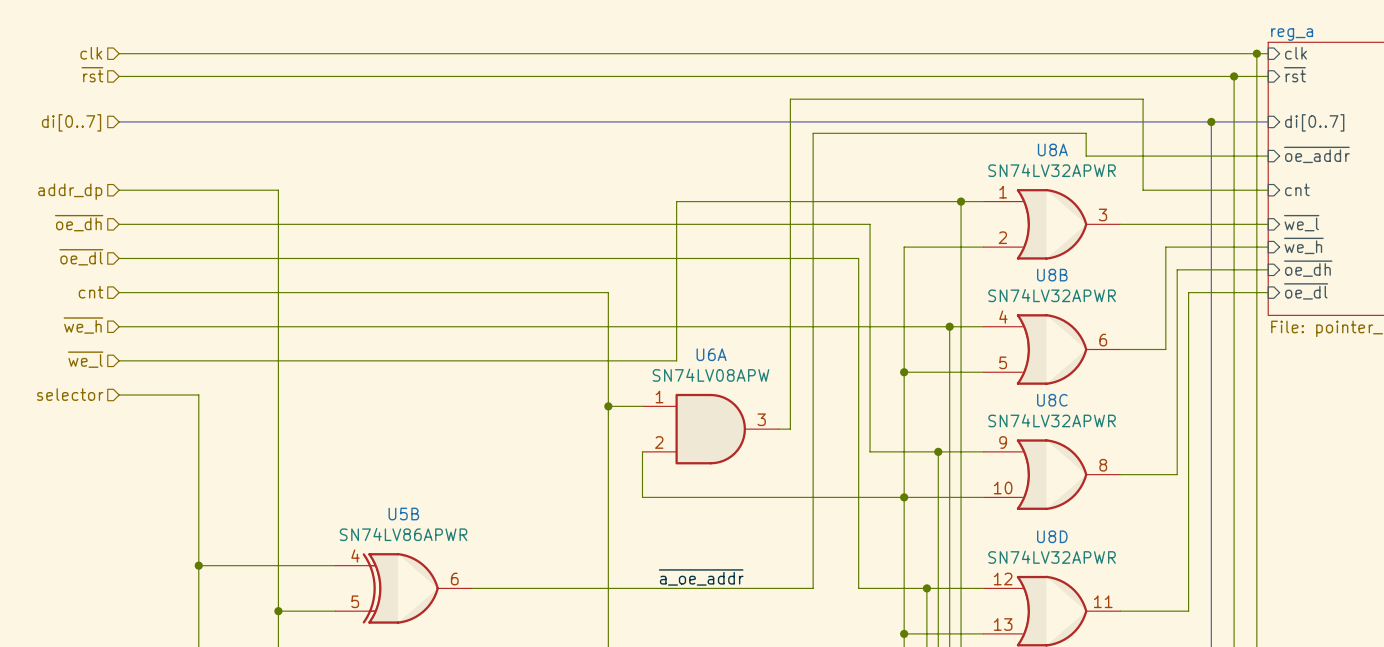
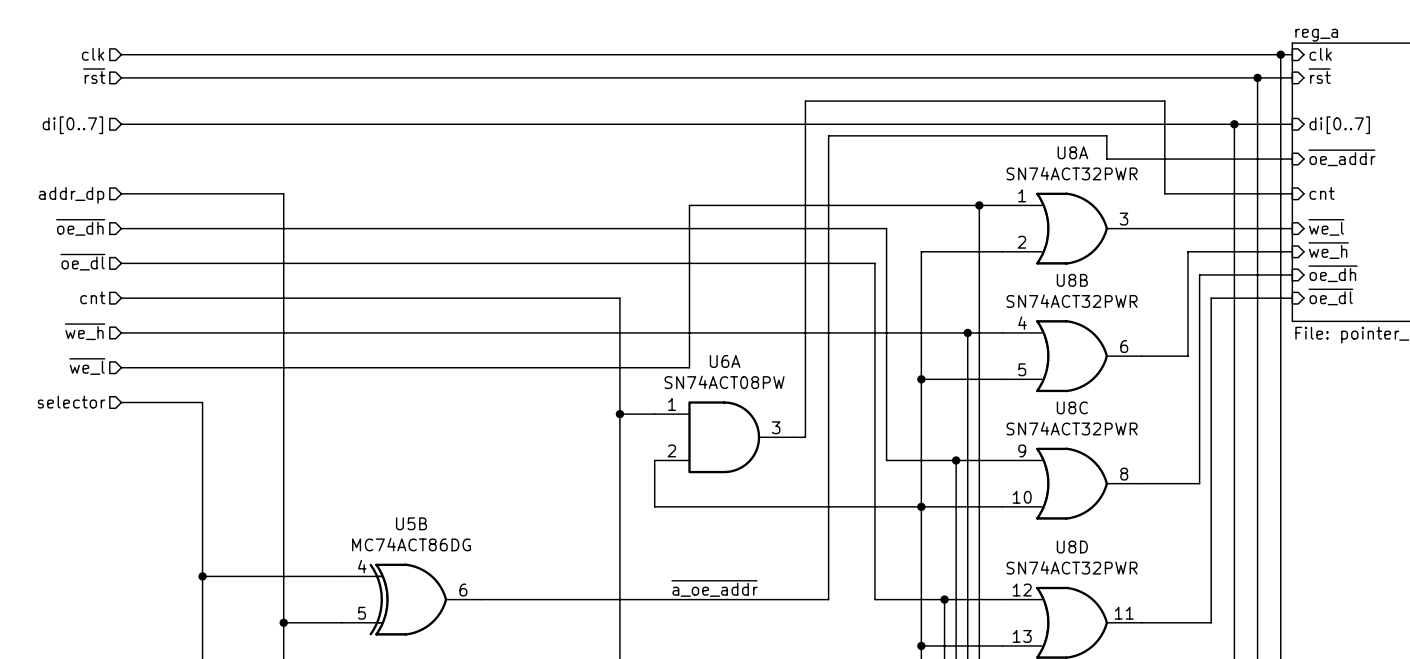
U8A value: SN74LV32APWR (1052, 170) -> SN74ACT32PWR (1072, 173)
U8B value: SN74LV32APWR (1052, 295) -> SN74ACT32PWR (1072, 301)
U6A value: SN74LV08APW (711, 375) -> SN74ACT08PW (724, 382)
U8C value: SN74LV32APWR (1052, 420) -> SN74ACT32PWR (1072, 428)
U5B value: SN74LV86APWR (403, 534) -> MC74ACT86DG (411, 544)
U8D value: SN74LV32APWR (1052, 557) -> SN74ACT32PWR (1072, 567)

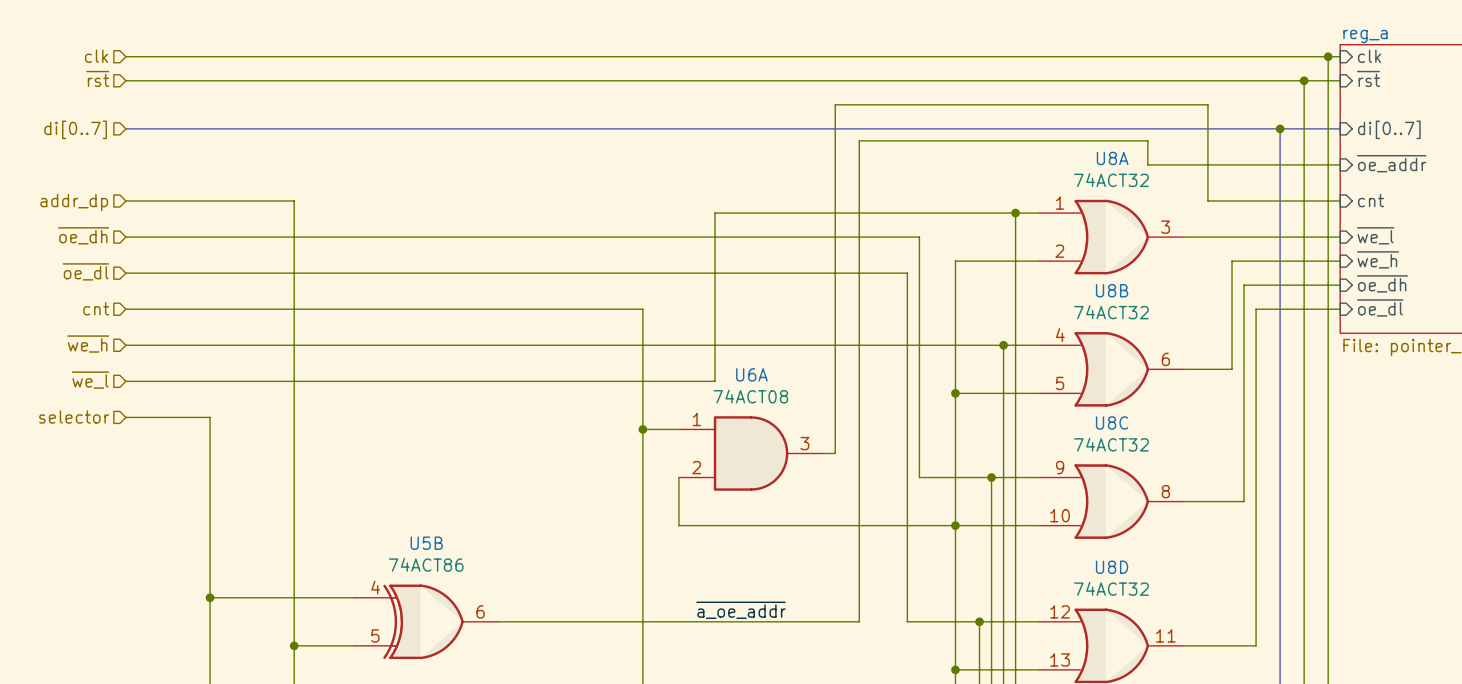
U8A value: SN74ACT32PWR (1072, 173) -> 74ACT32 (1111, 180)
U8B value: SN74ACT32PWR (1072, 301) -> 74ACT32 (1111, 312)
U6A value: SN74ACT08PW (724, 382) -> 74ACT08 (750, 396)
U8C value: SN74ACT32PWR (1072, 428) -> 74ACT32 (1111, 444)
U5B value: MC74ACT86DG (411, 544) -> 74ACT86 (426, 564)
U8D value: SN74ACT32PWR (1072, 567) -> 74ACT32 (1111, 588)

